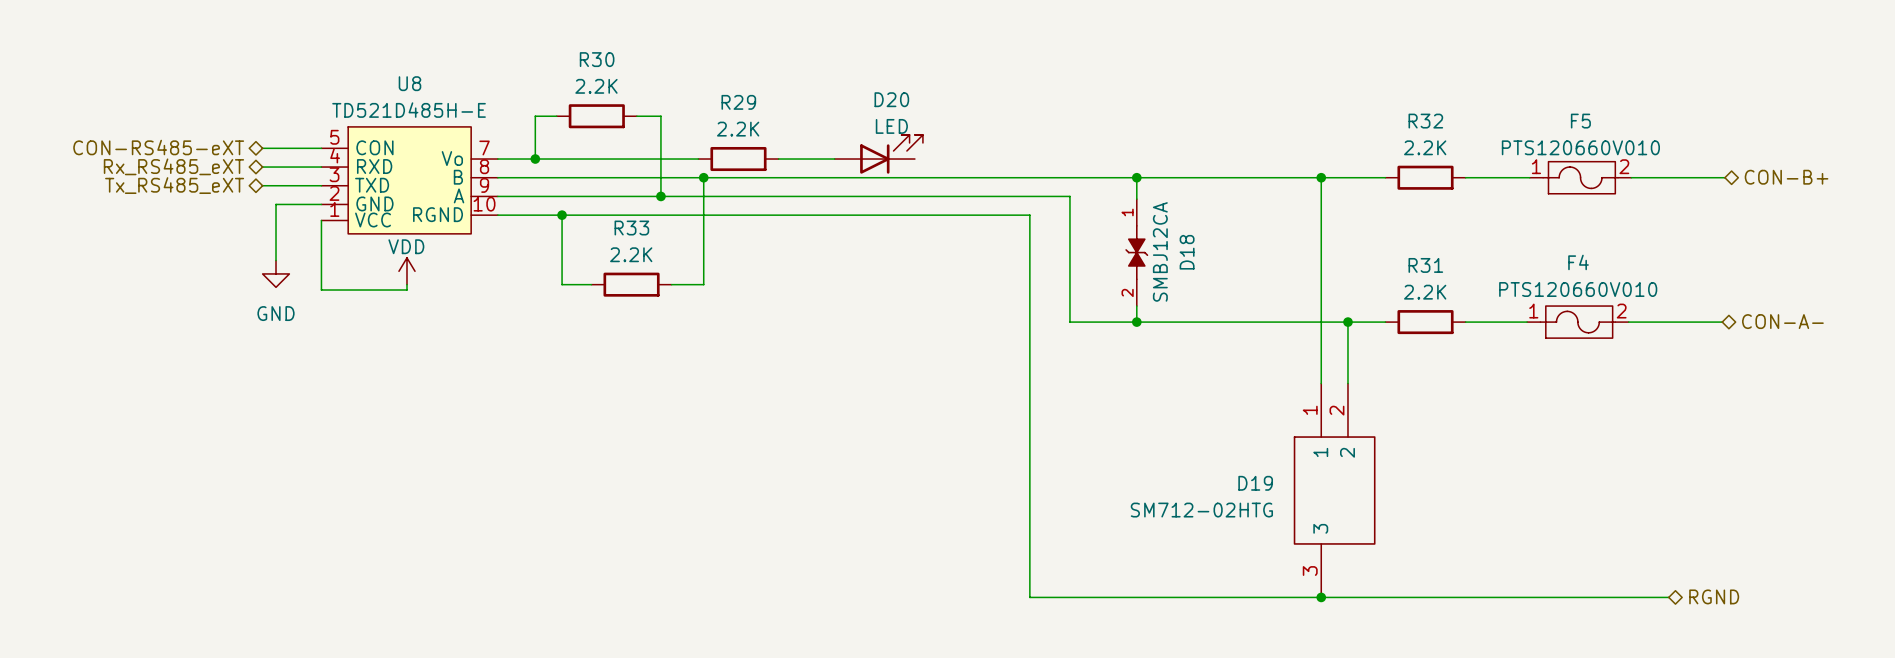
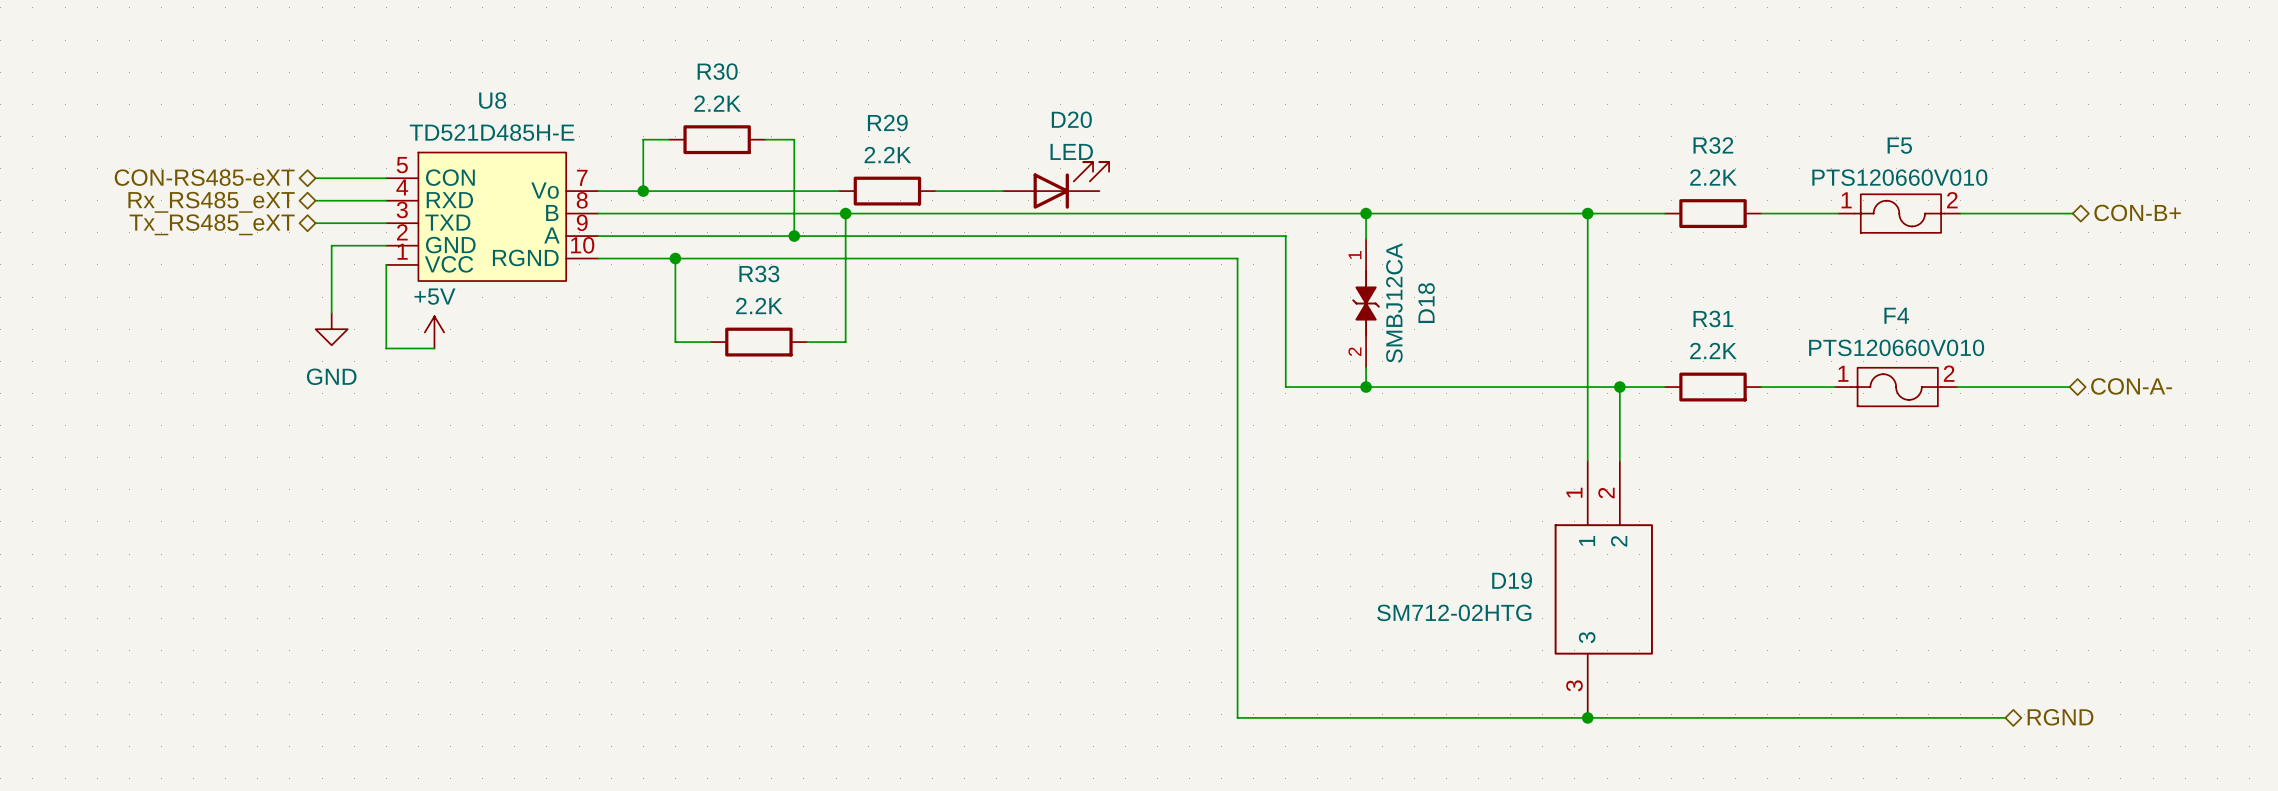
power symbol: VDD (406, 271) -> none
power symbol: none -> +5V (434, 332)
wire: (406, 284) (406, 290) (361, 290) -> none

